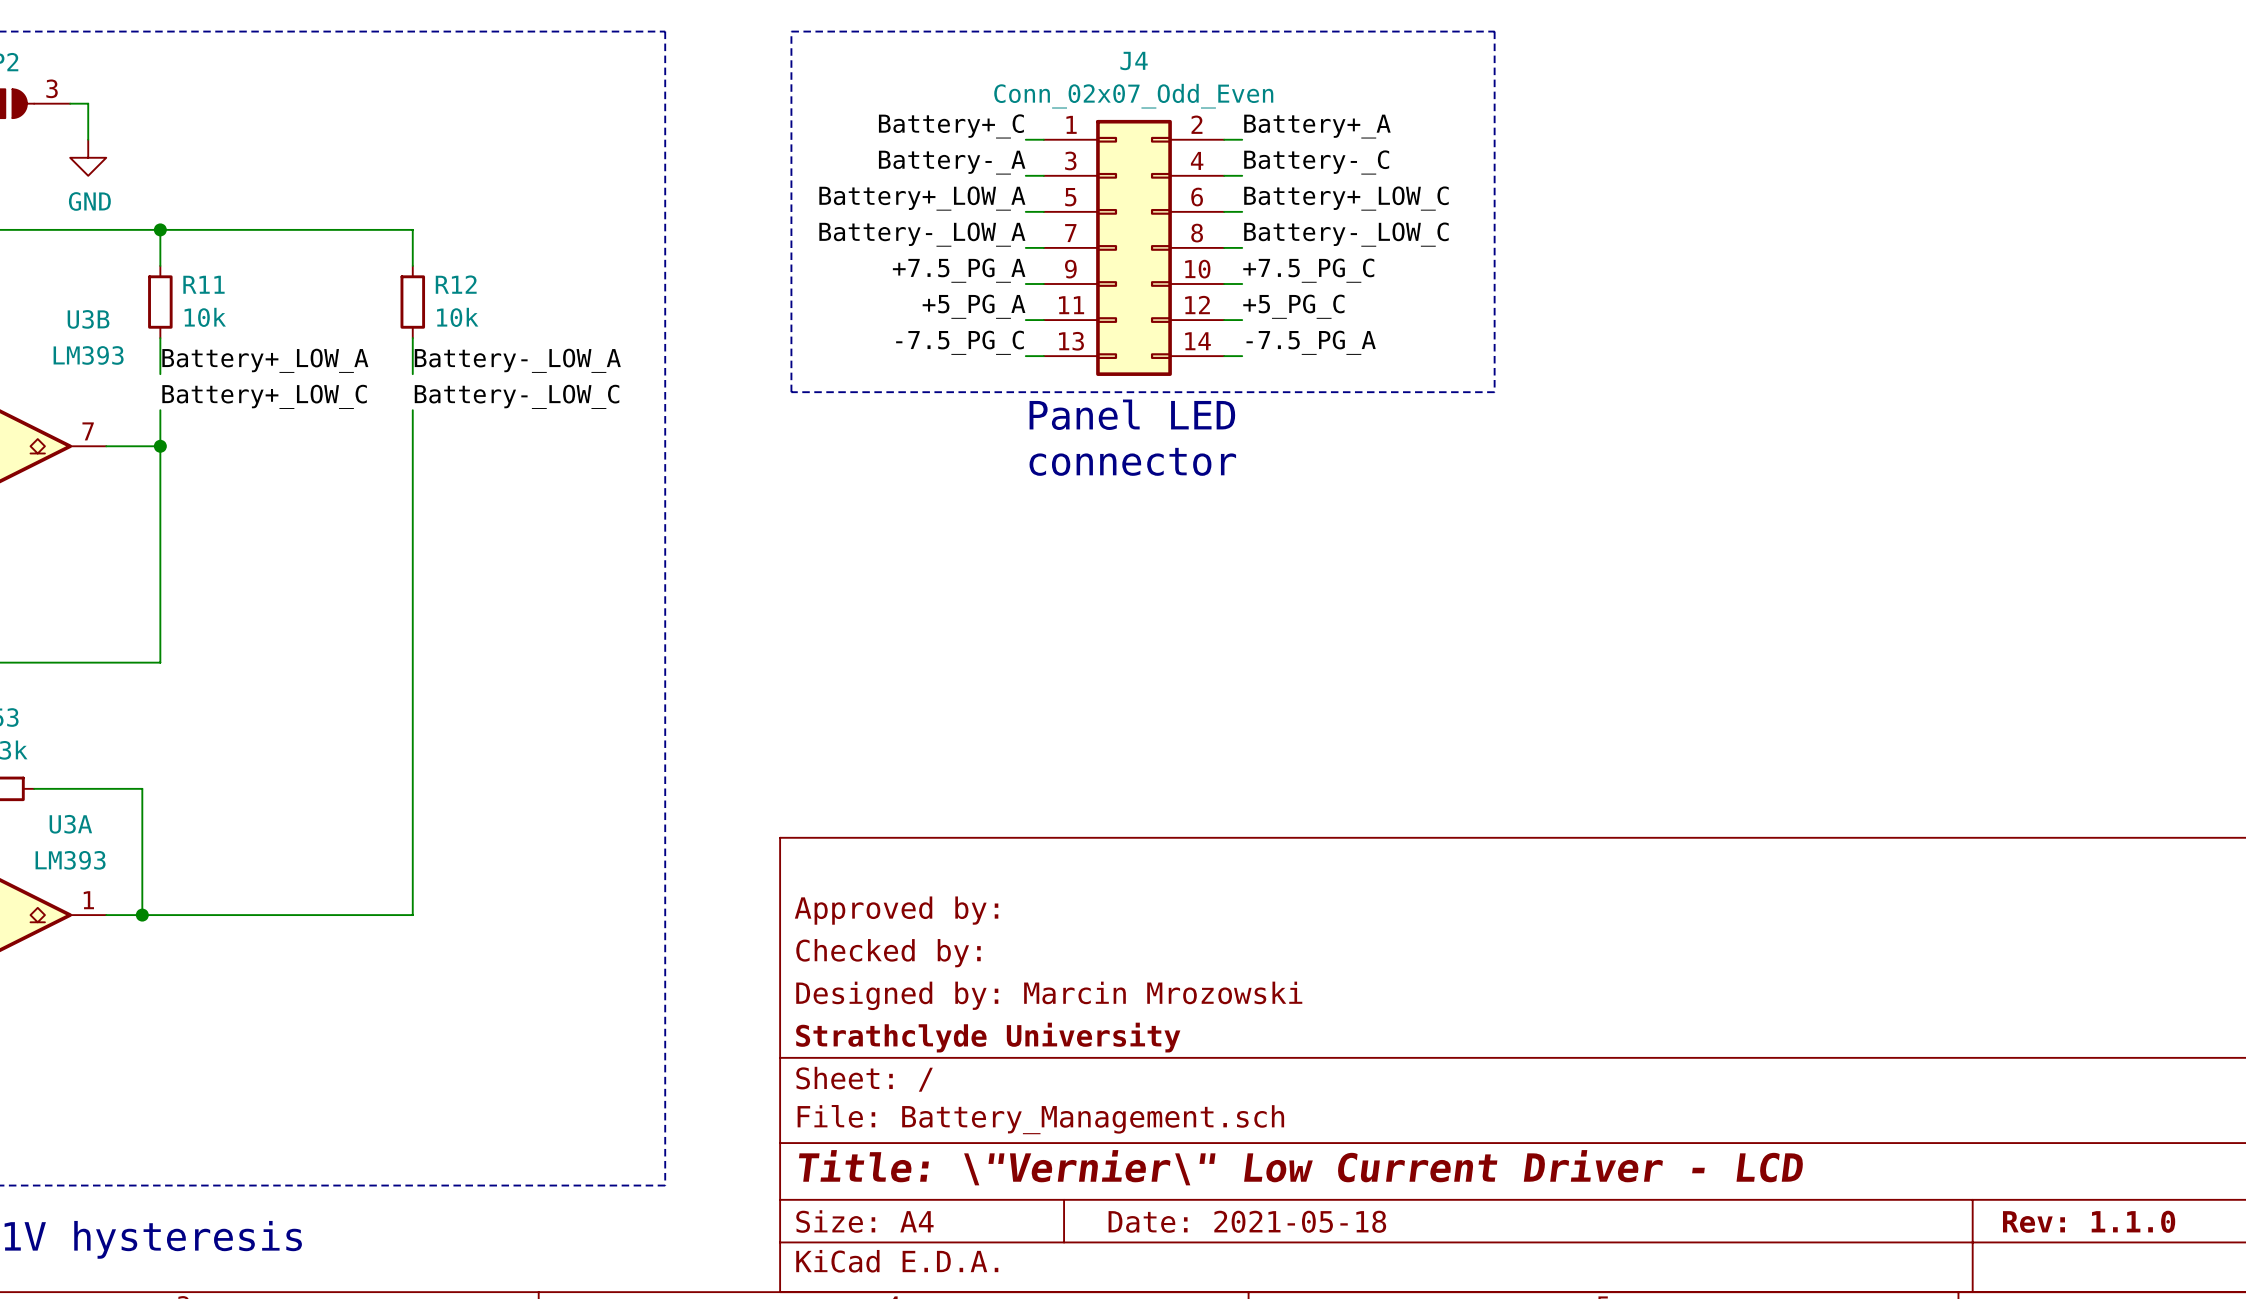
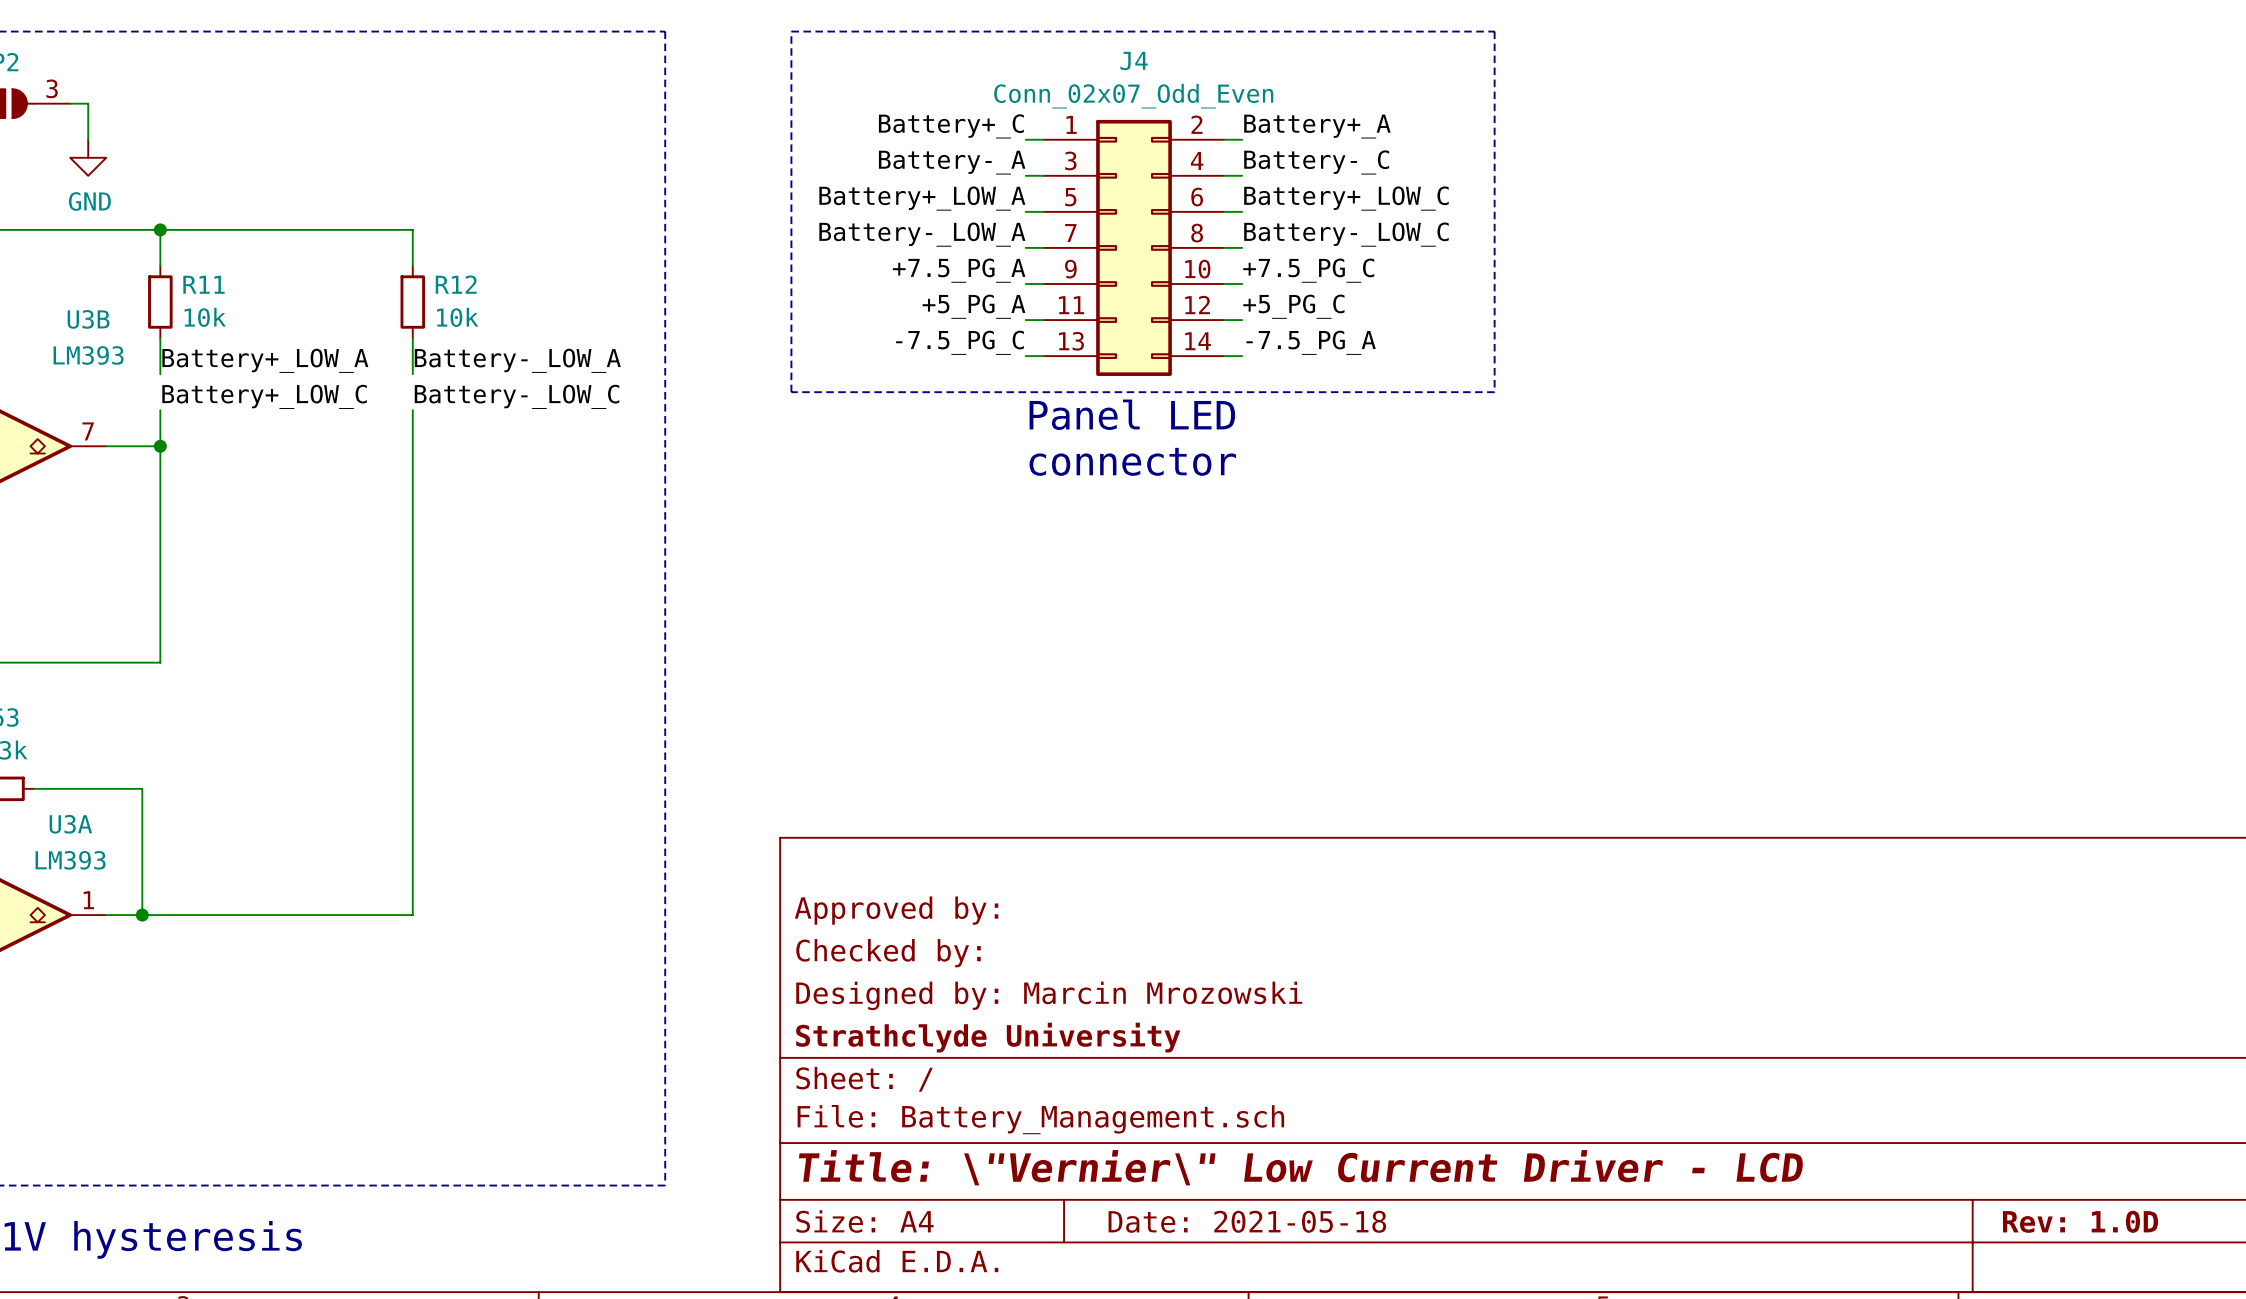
title block: Rev: 1.1.0 (2089, 1221) -> Rev: 1.0D (2080, 1221)

